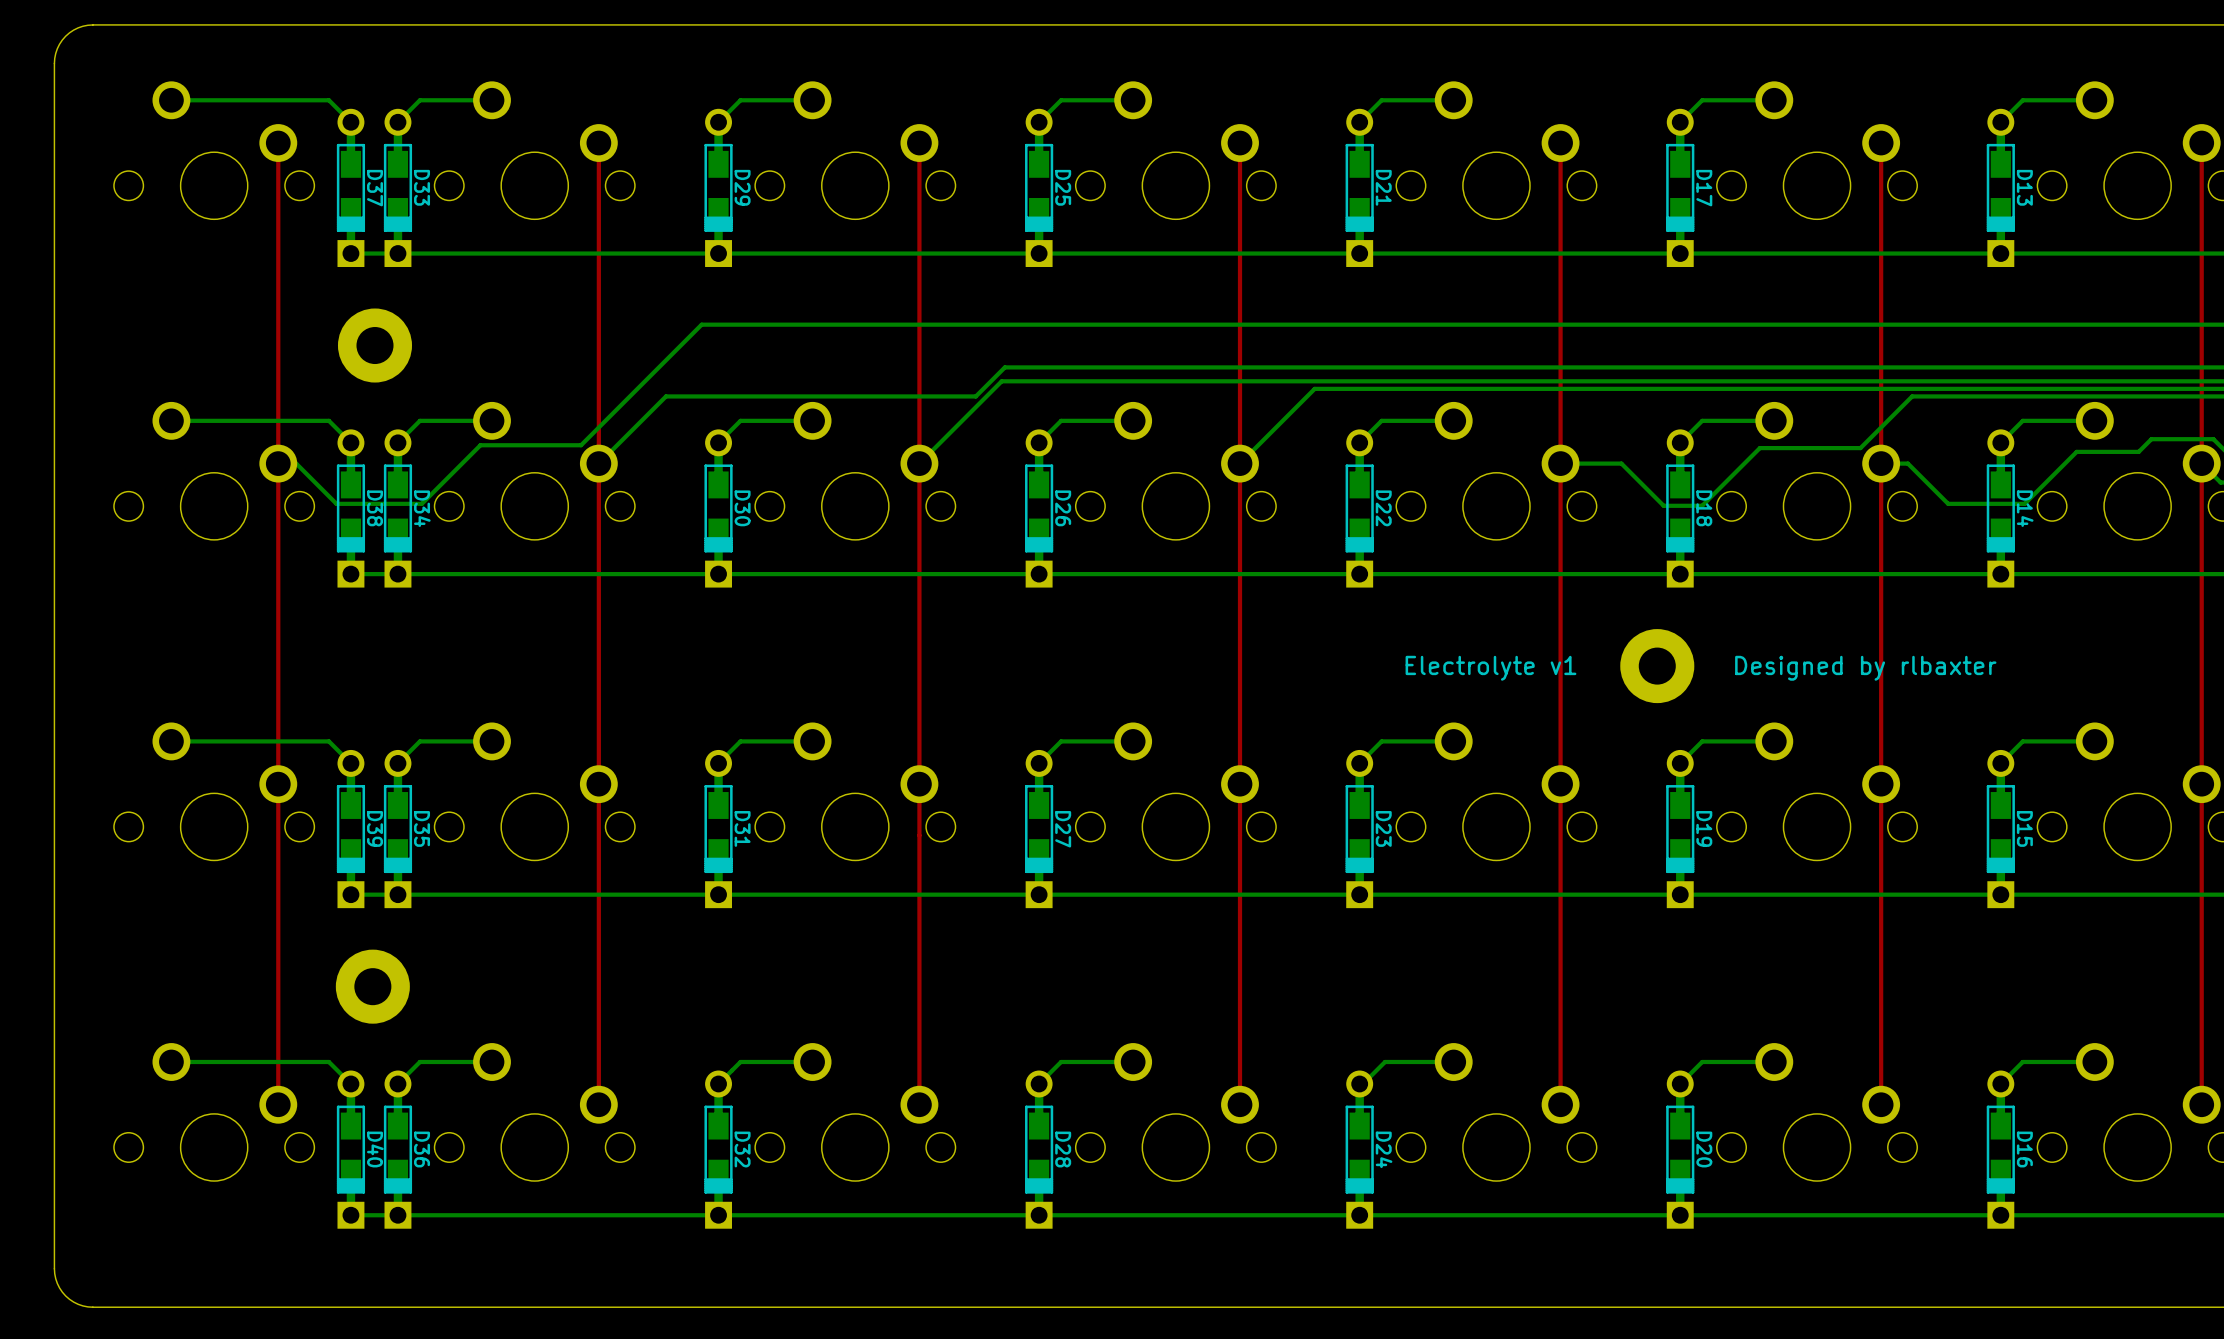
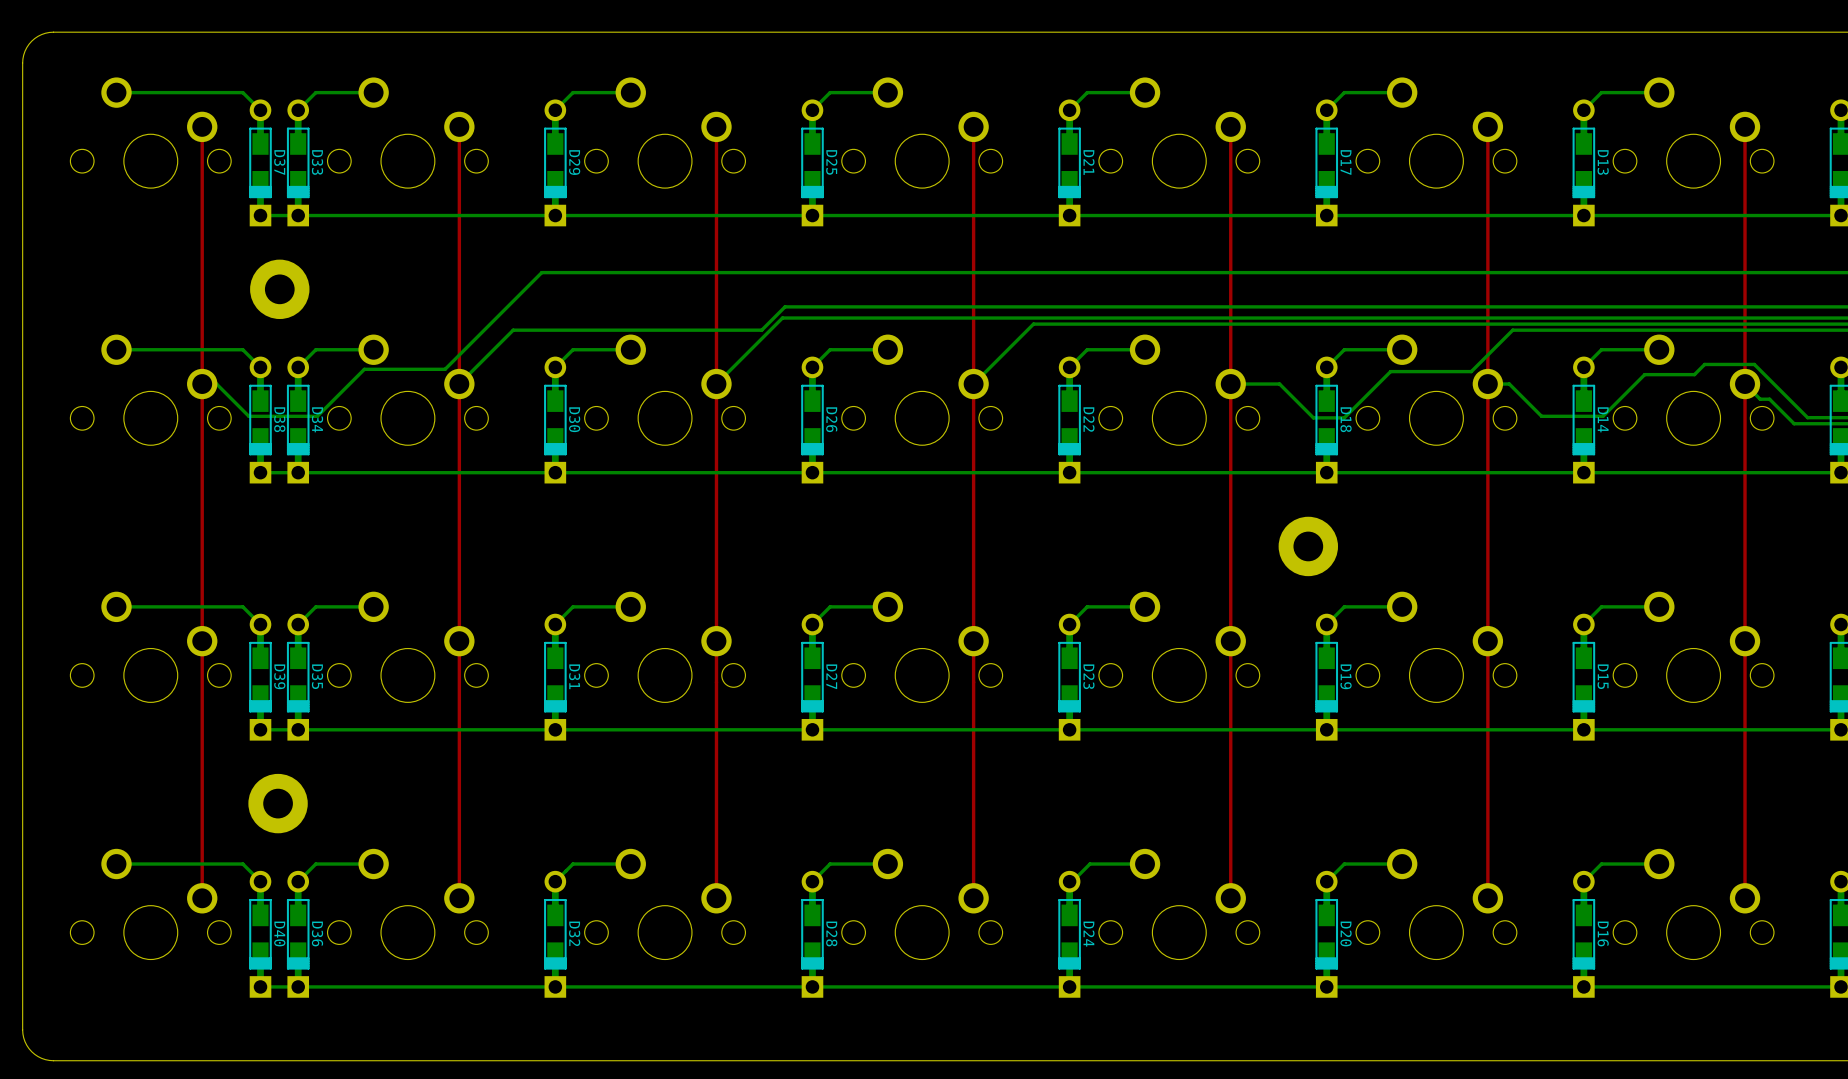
text: Electrolyte v1 (1490, 668) -> none
text: Designed by rlbaxter (1865, 668) -> none

